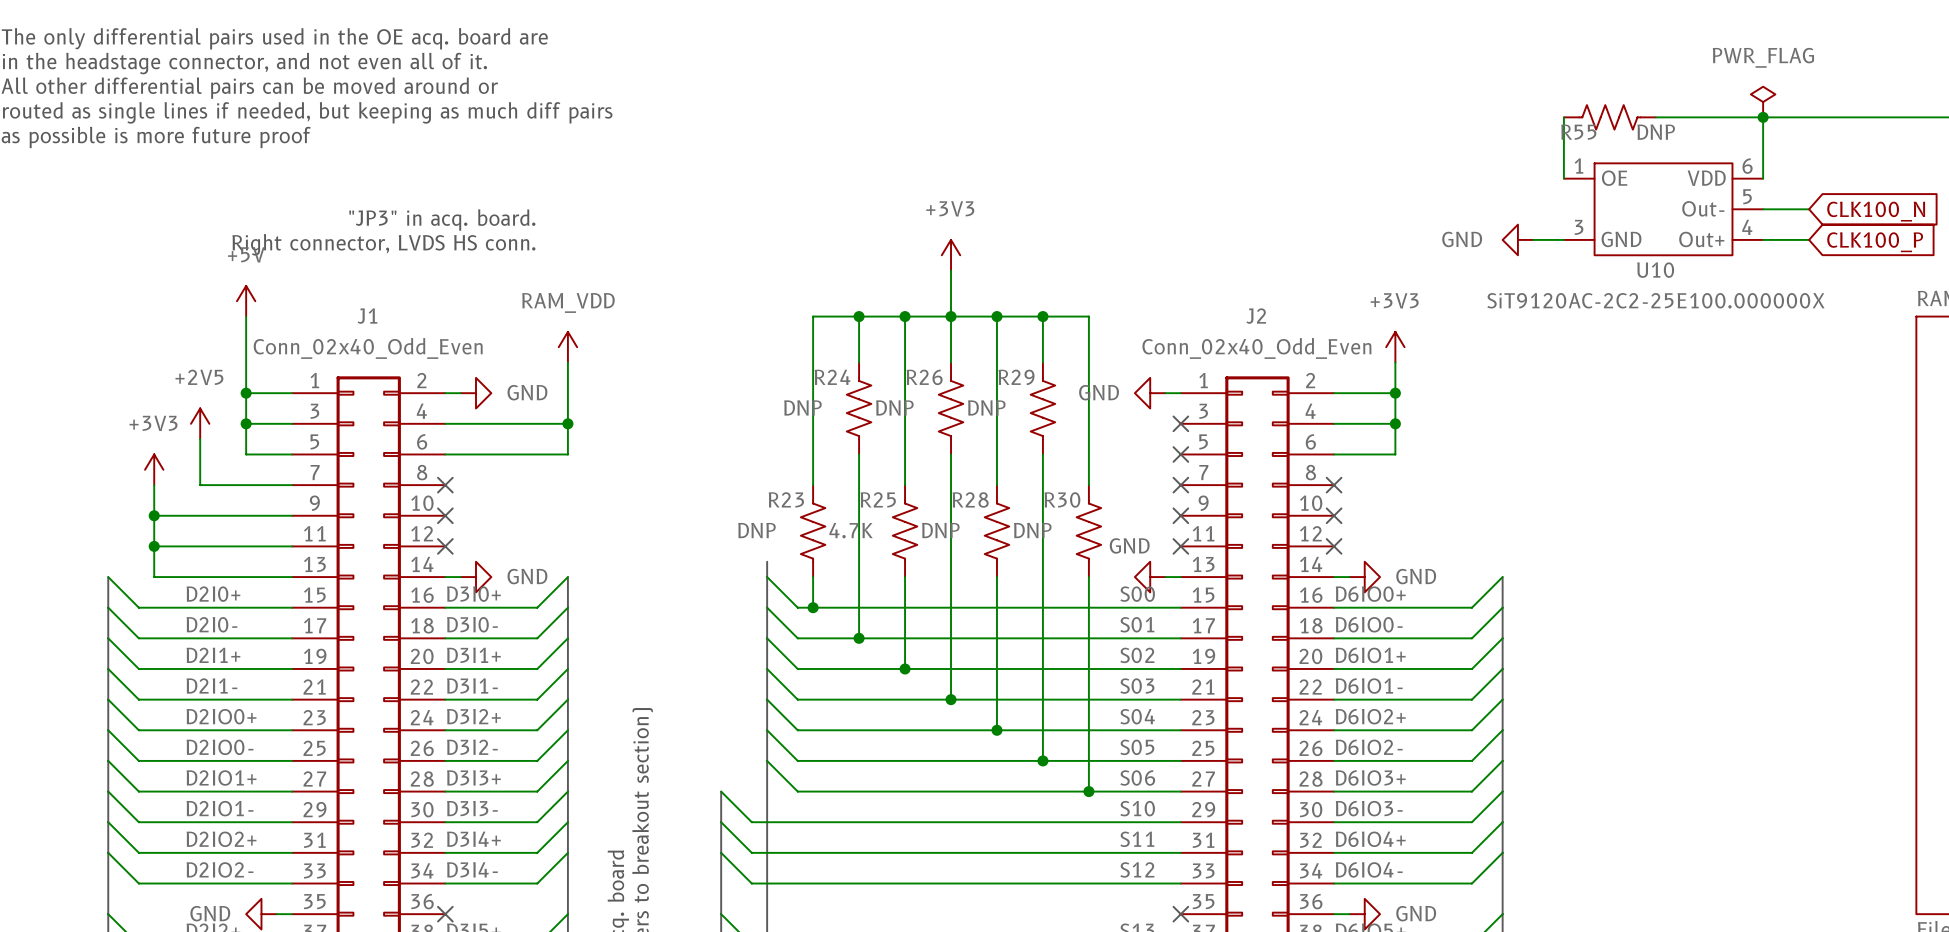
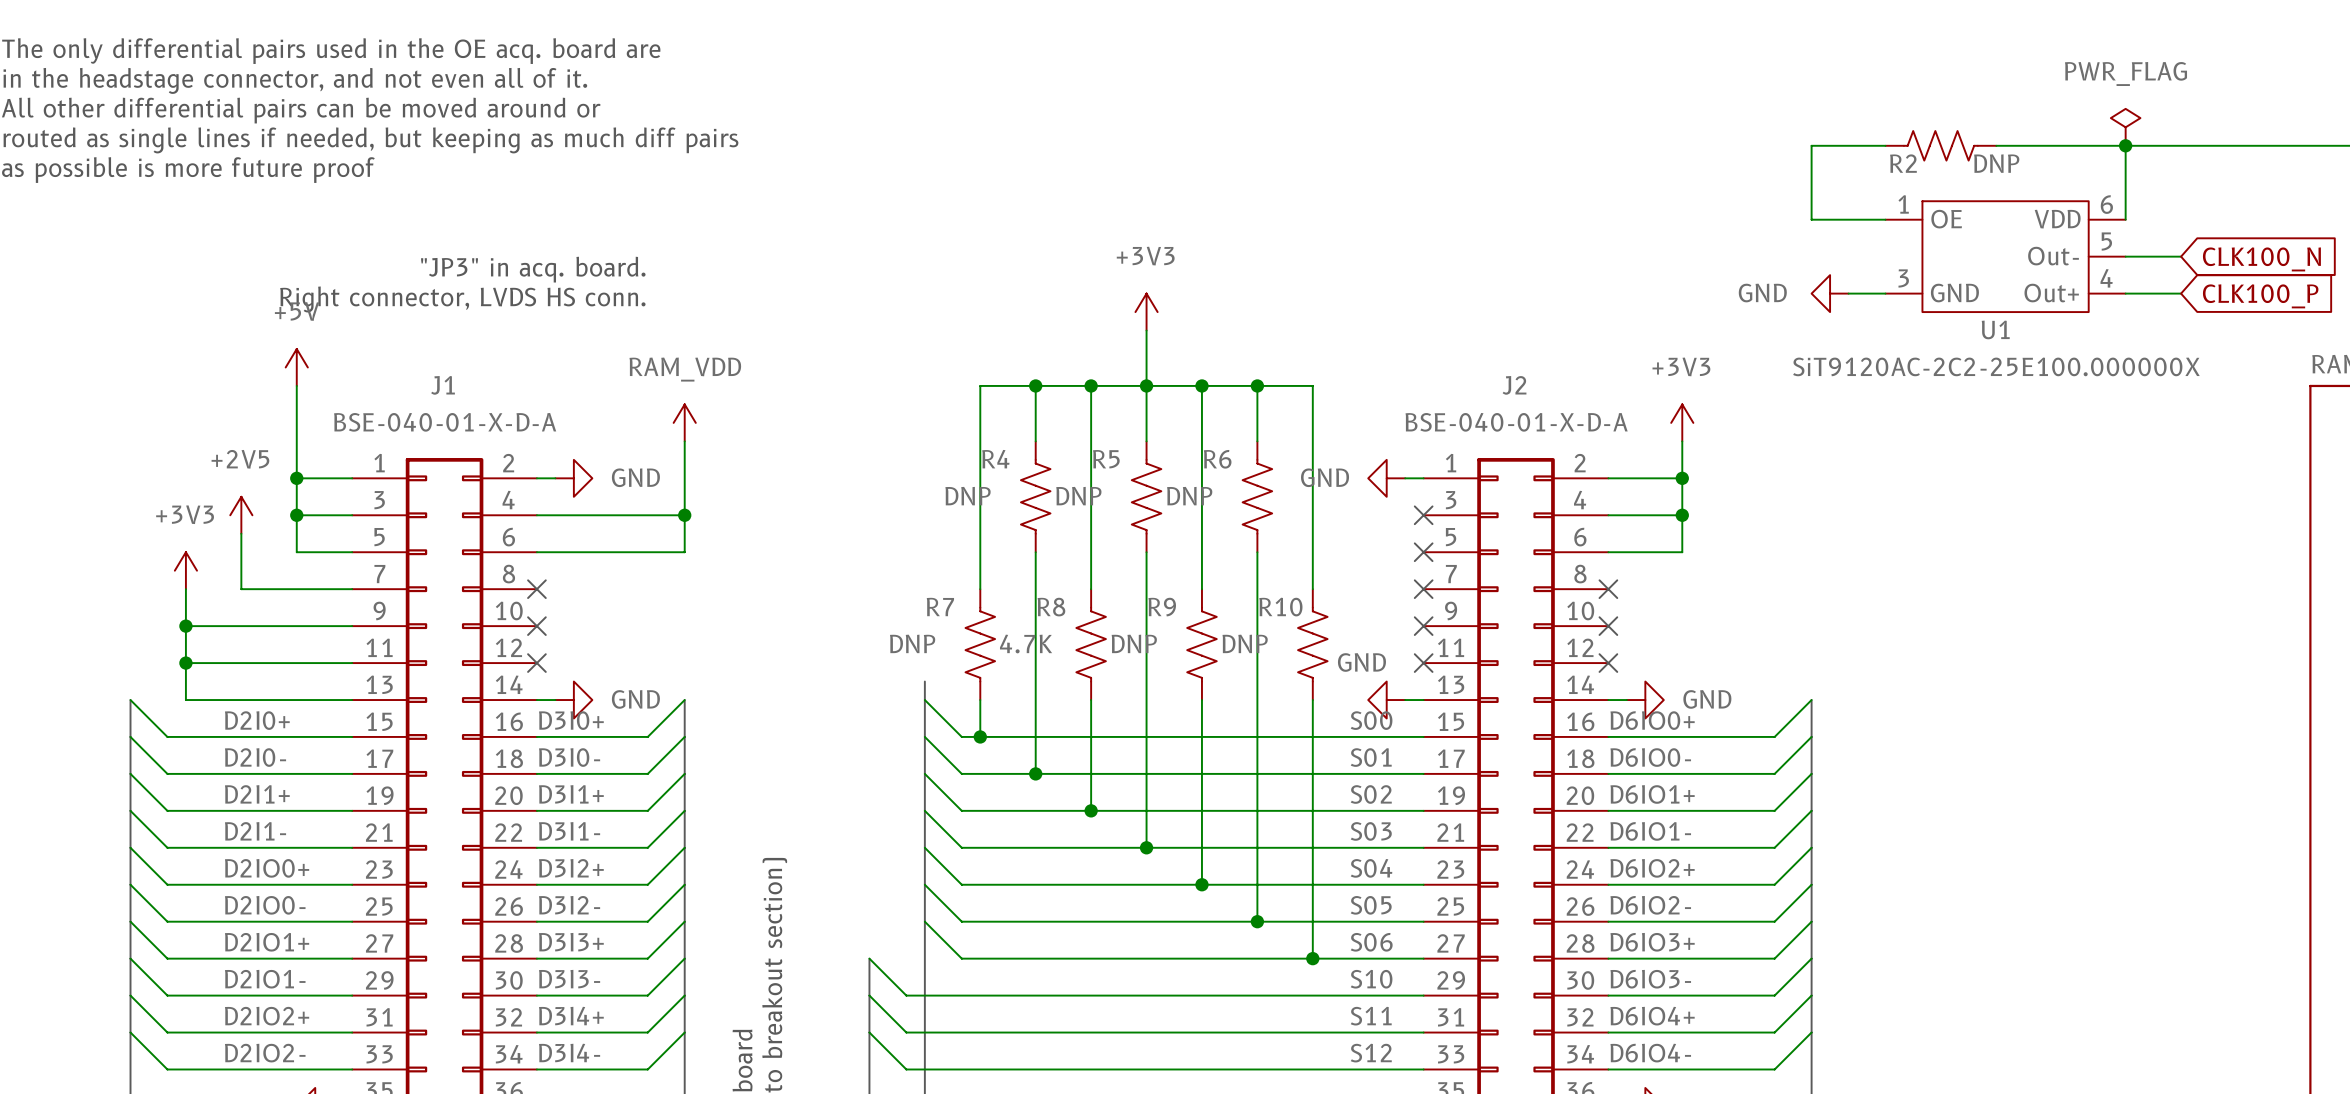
wire: (1563, 117) (1563, 178) -> (1885, 145) (1811, 145) (1811, 219) (1885, 219)
R55 name: R55 (1578, 132) -> R2 (1903, 163)
U10 name: U10 (1655, 270) -> U1 (1995, 329)
J1 value: Conn_02x40_Odd_Even (368, 348) -> BSE-040-01-X-D-A (445, 422)
J2 value: Conn_02x40_Odd_Even (1256, 348) -> BSE-040-01-X-D-A (1516, 422)
R24 name: R24 (832, 377) -> R4 (995, 459)
R26 name: R26 (924, 377) -> R5 (1106, 459)
R29 name: R29 (1016, 377) -> R6 (1217, 459)
R23 name: R23 (786, 499) -> R7 (940, 607)
R25 name: R25 (878, 499) -> R8 (1051, 607)
R28 name: R28 (970, 499) -> R9 (1162, 607)
R30 name: R30 (1062, 499) -> R10 (1280, 607)

